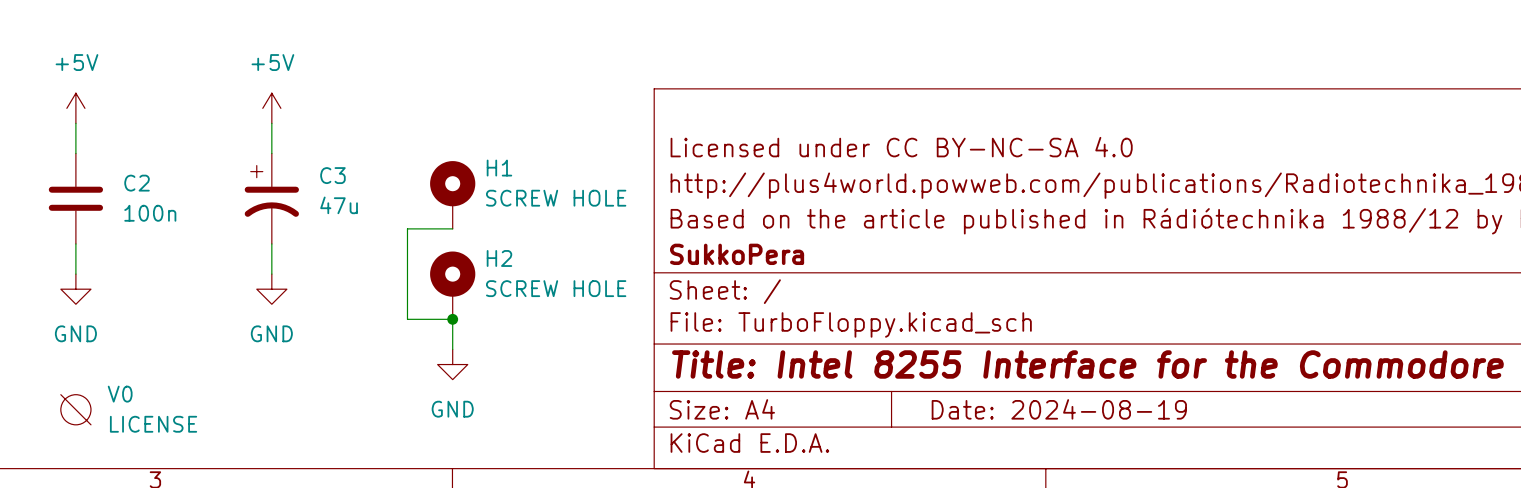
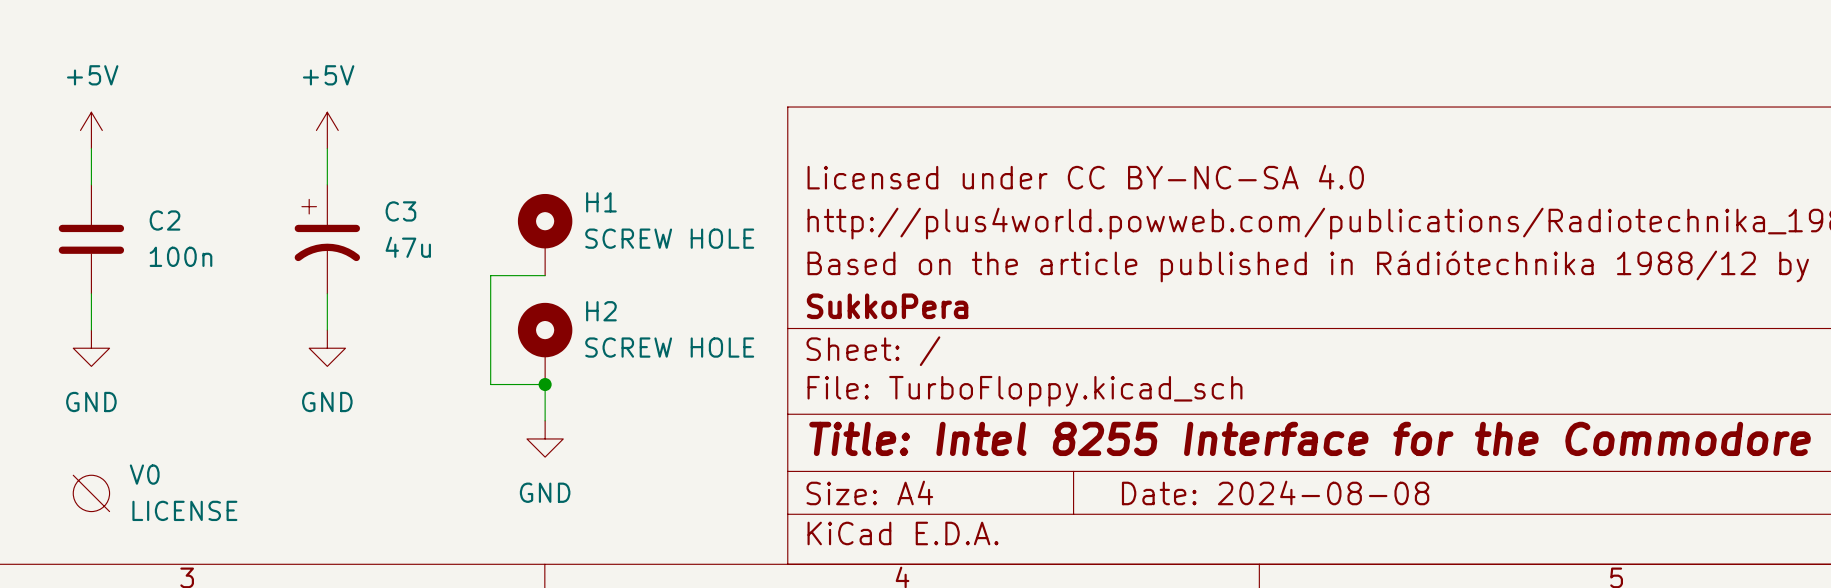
title block: Date: 2024-08-19 (1059, 409) -> Date: 2024-08-08 (1275, 492)

